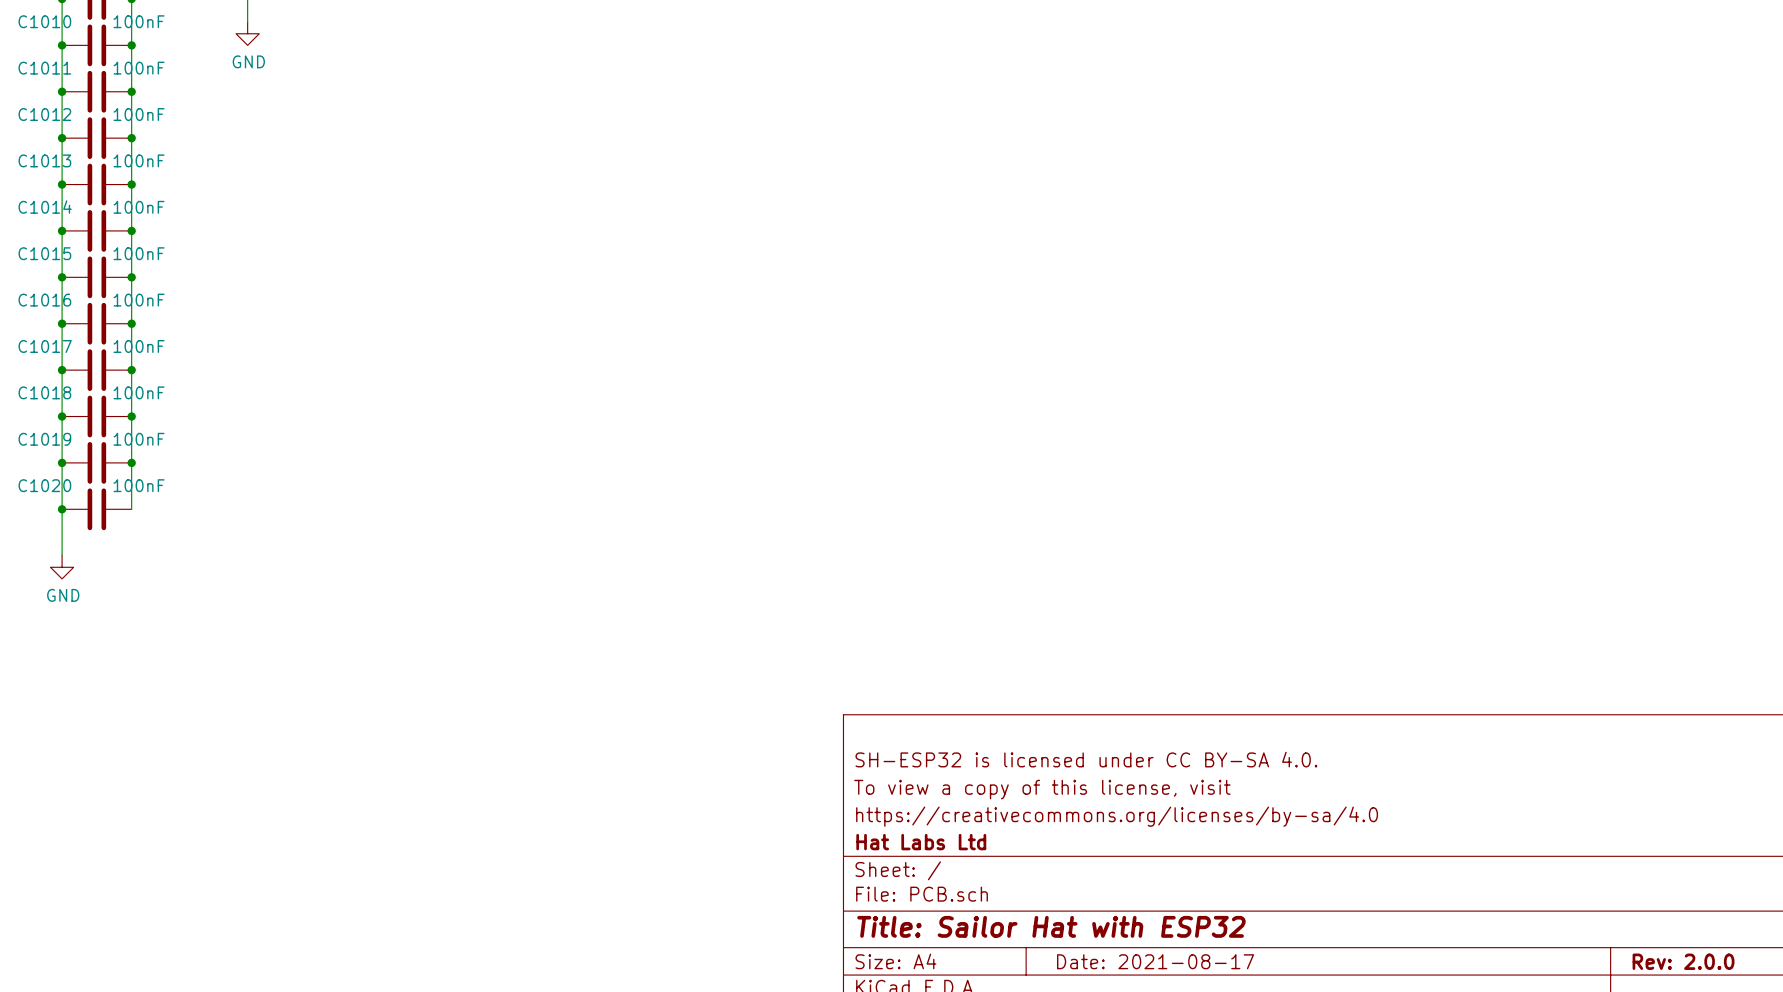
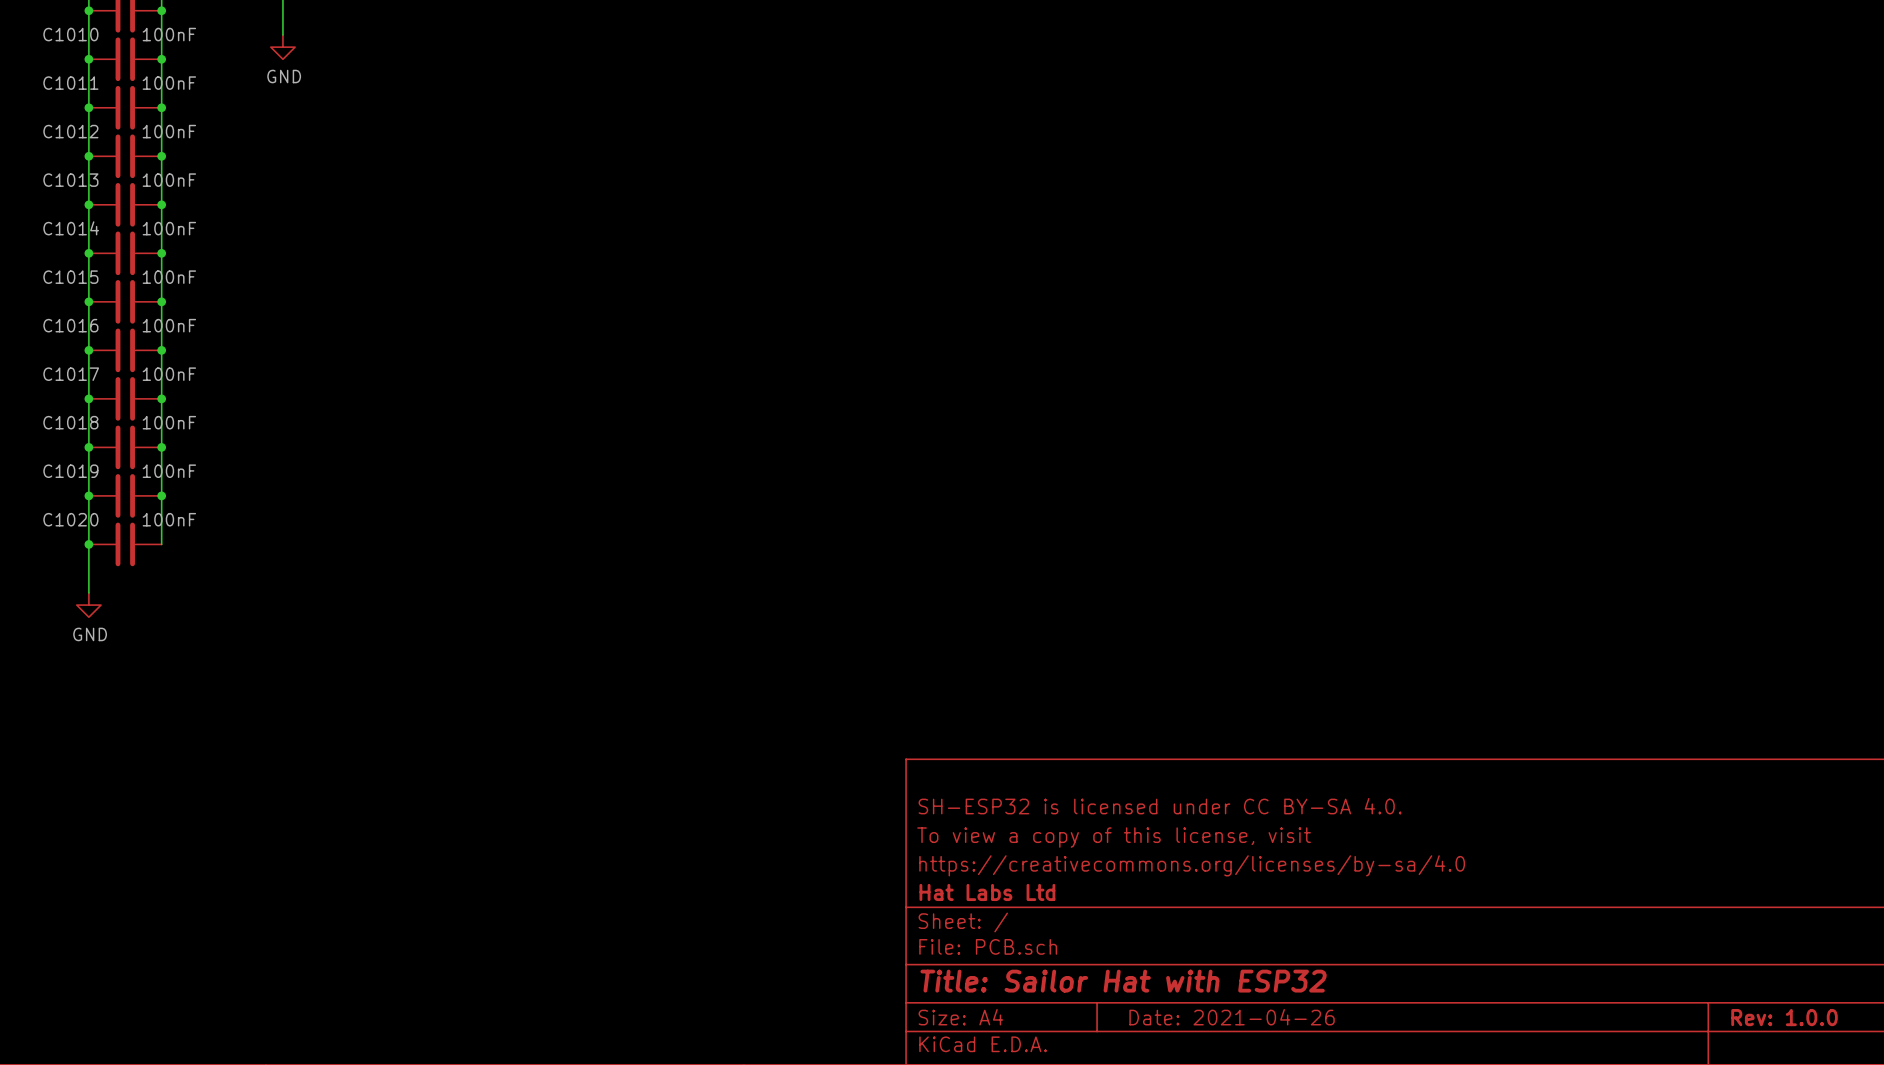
title block: Date: 2021-08-17 (1155, 961) -> Date: 2021-04-26 (1232, 1017)
title block: Rev: 2.0.0 (1683, 961) -> Rev: 1.0.0 (1784, 1017)

